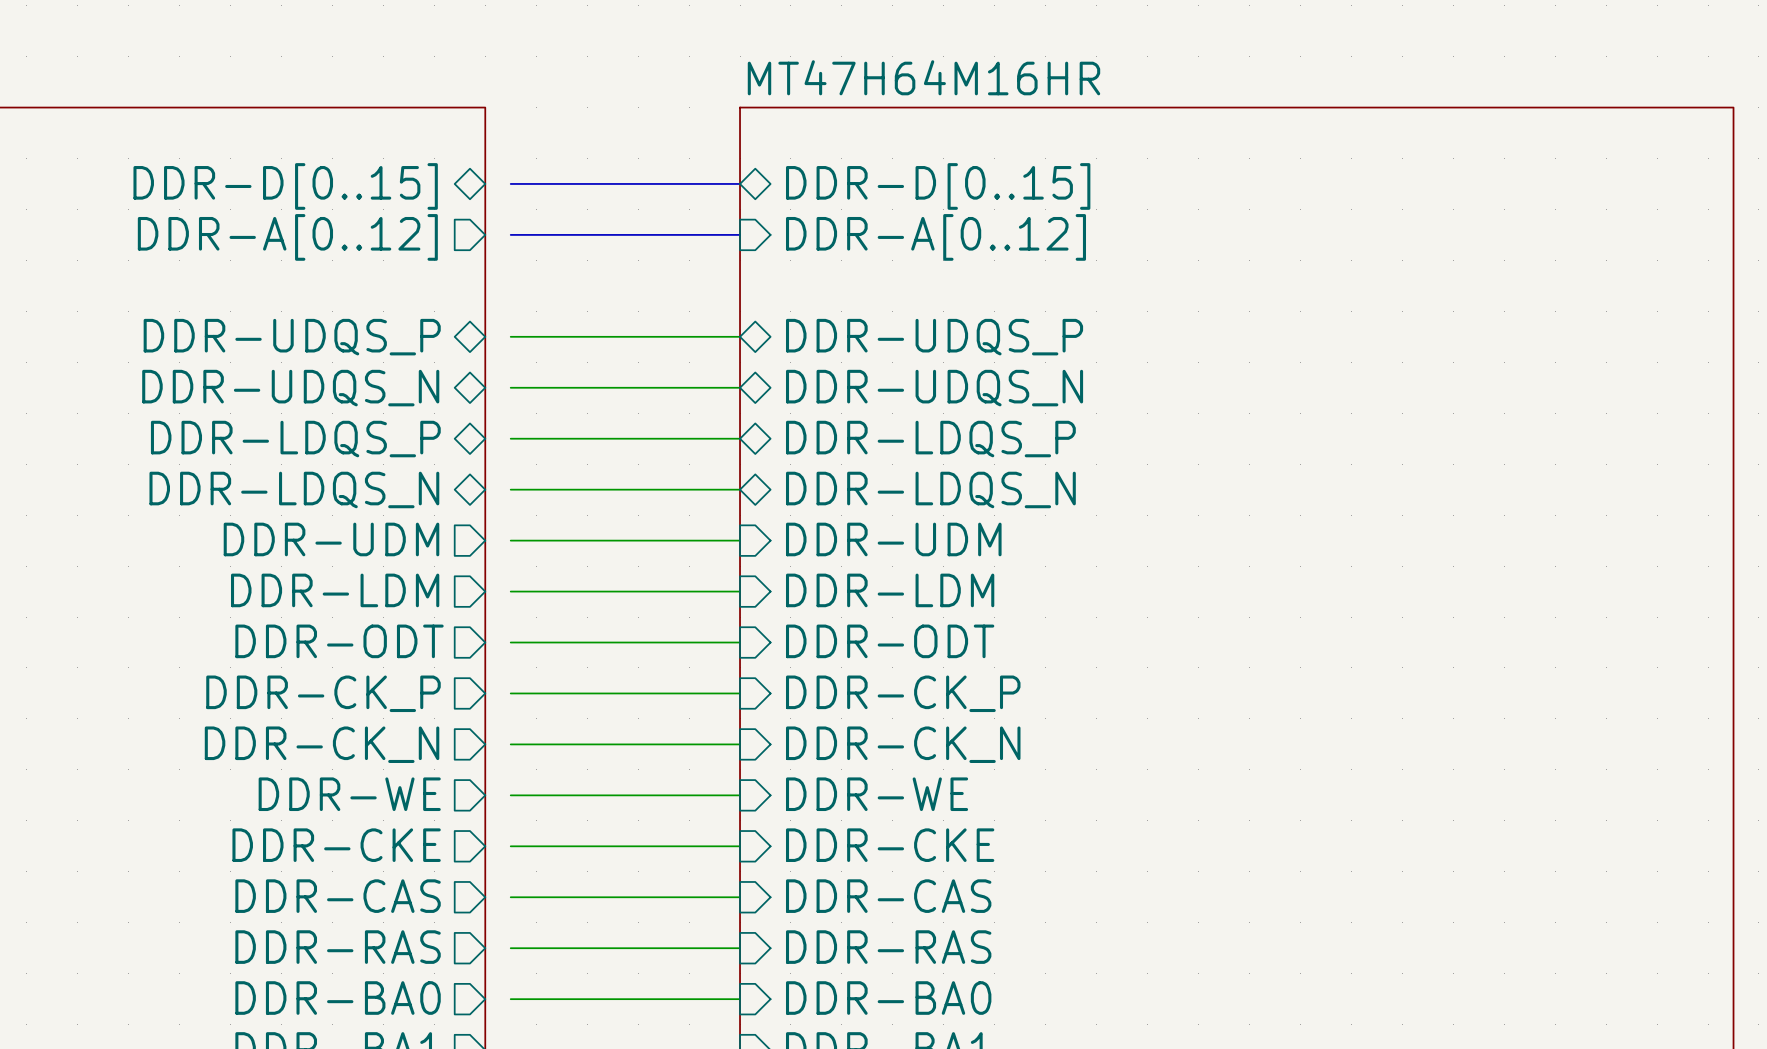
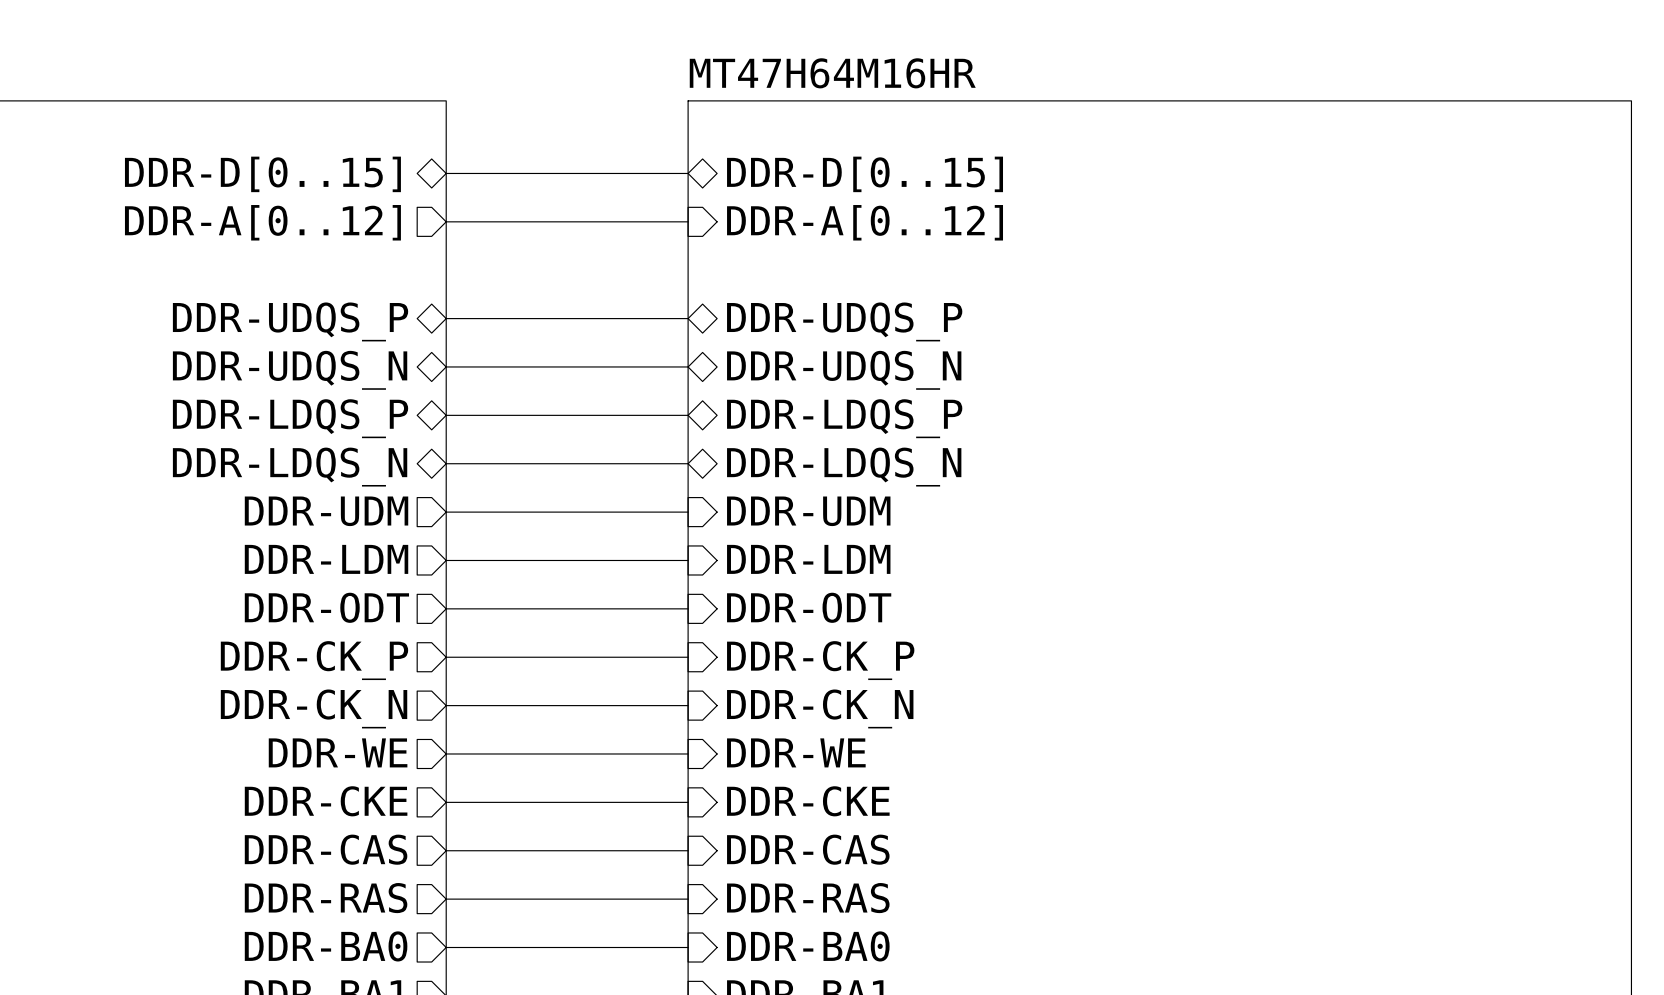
bus: none -> (446, 173) (470, 173)
bus: none -> (446, 221) (470, 221)
wire: none -> (446, 318) (470, 318)
wire: none -> (446, 366) (470, 366)
wire: none -> (446, 415) (470, 415)
wire: none -> (446, 463) (470, 463)
wire: none -> (446, 512) (470, 512)
wire: none -> (446, 560) (470, 560)
wire: none -> (446, 608) (470, 608)
wire: none -> (446, 657) (470, 657)
wire: none -> (446, 705) (470, 705)
wire: none -> (446, 753) (470, 753)
wire: none -> (446, 802) (470, 802)
wire: none -> (446, 850) (470, 850)
wire: none -> (446, 899) (470, 899)
wire: none -> (446, 947) (470, 947)

